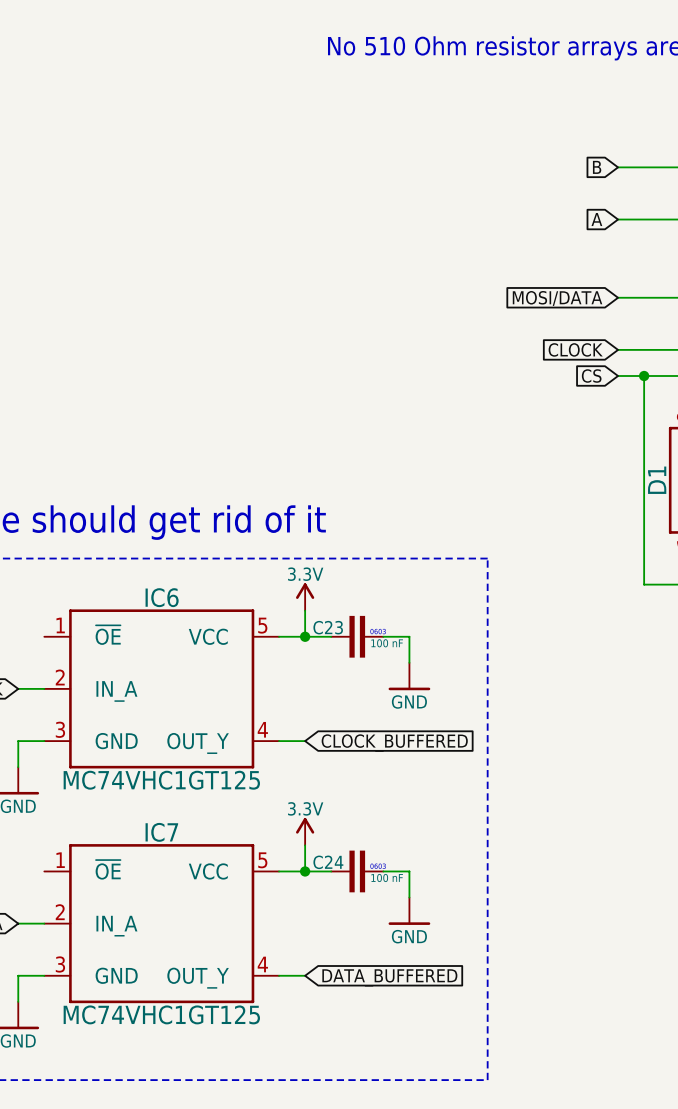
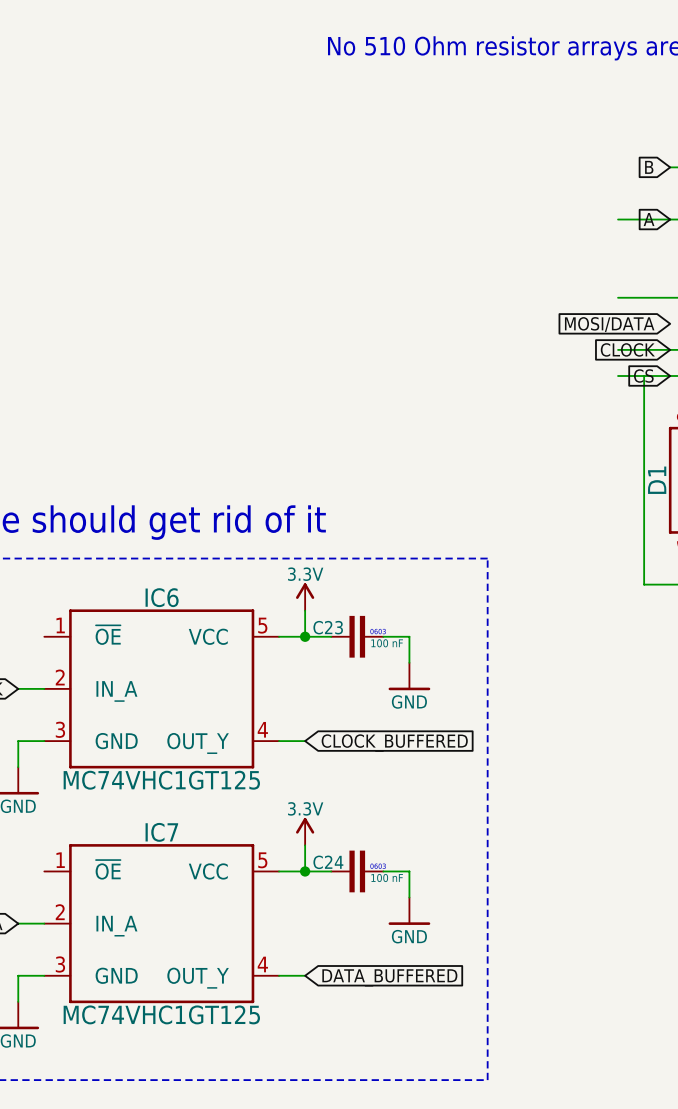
global label position: B (597, 167) -> B (649, 167)
wire: (618, 167) (670, 167) -> none
global label position: A (596, 219) -> A (649, 219)
global label position: MOSI/DATA (557, 298) -> MOSI/DATA (609, 324)
global label position: CLOCK (575, 349) -> CLOCK (627, 349)
global label position: CS (591, 376) -> CS (643, 376)
junction: (644, 376) -> none

